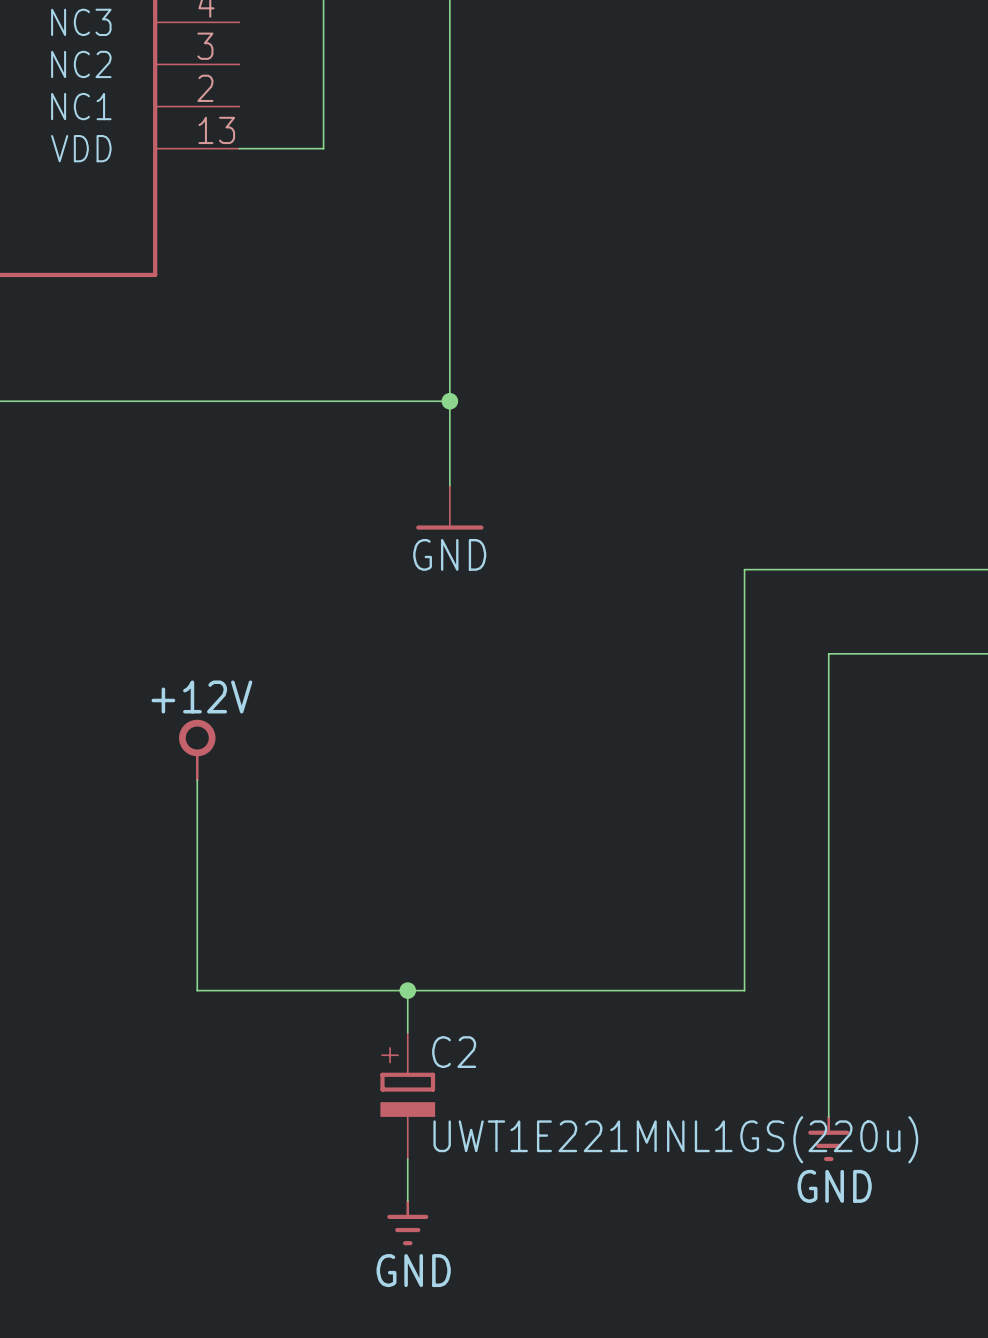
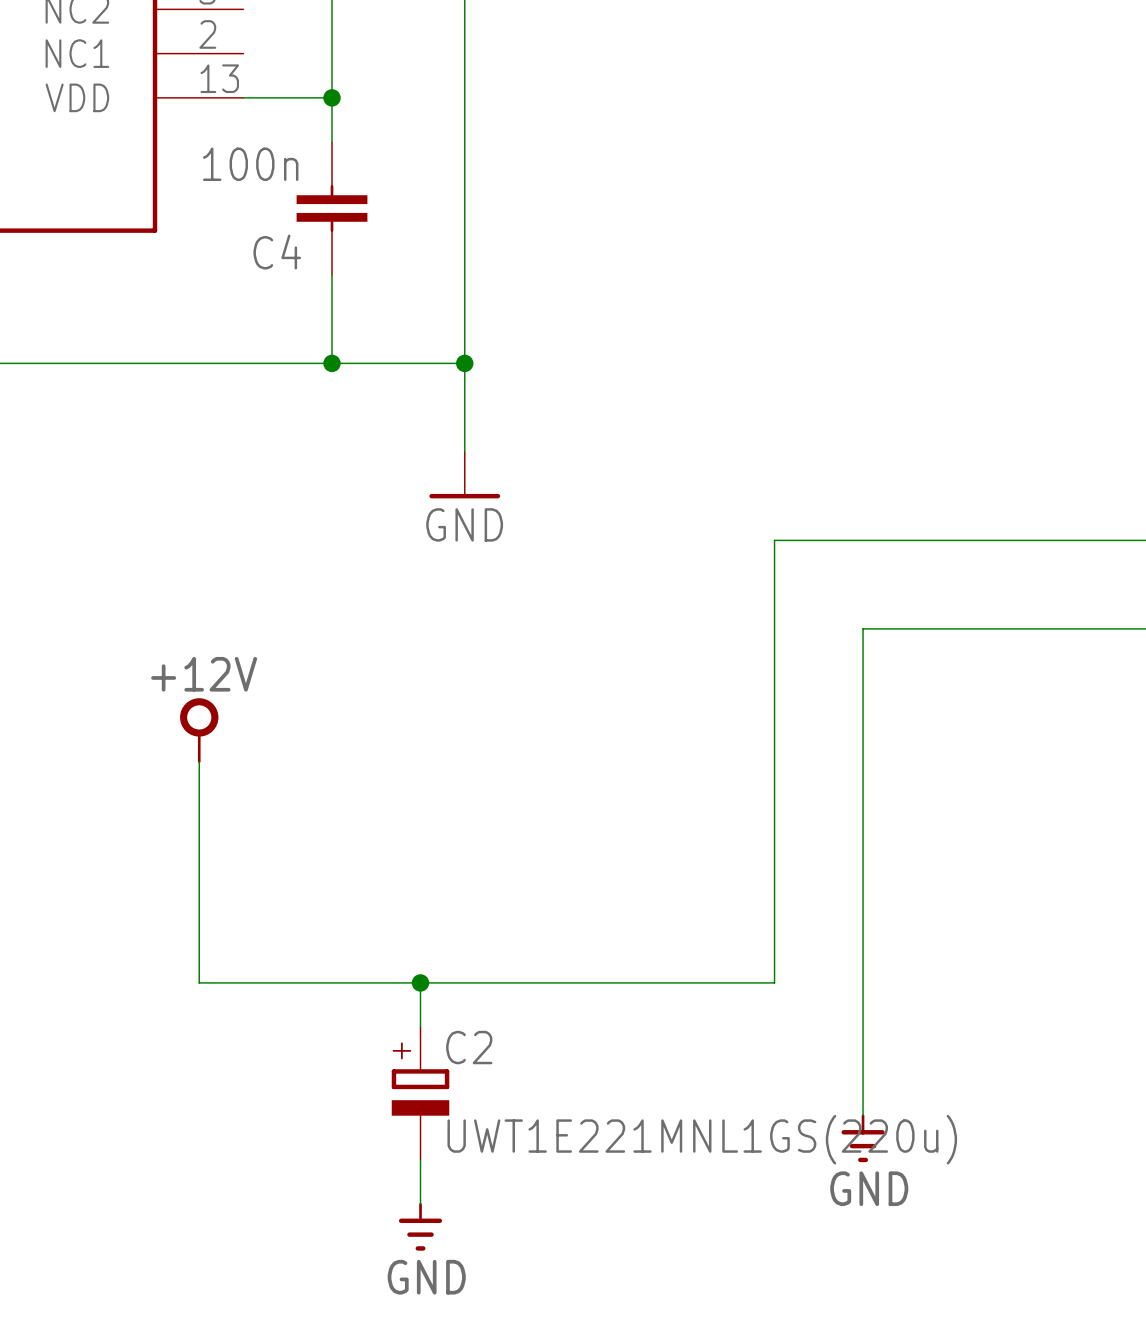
wire: none -> (332, 97) (332, 142)
junction: none -> (332, 97)
C4: none -> 100n (332, 208)
wire: none -> (332, 274) (332, 363)
junction: none -> (332, 363)

